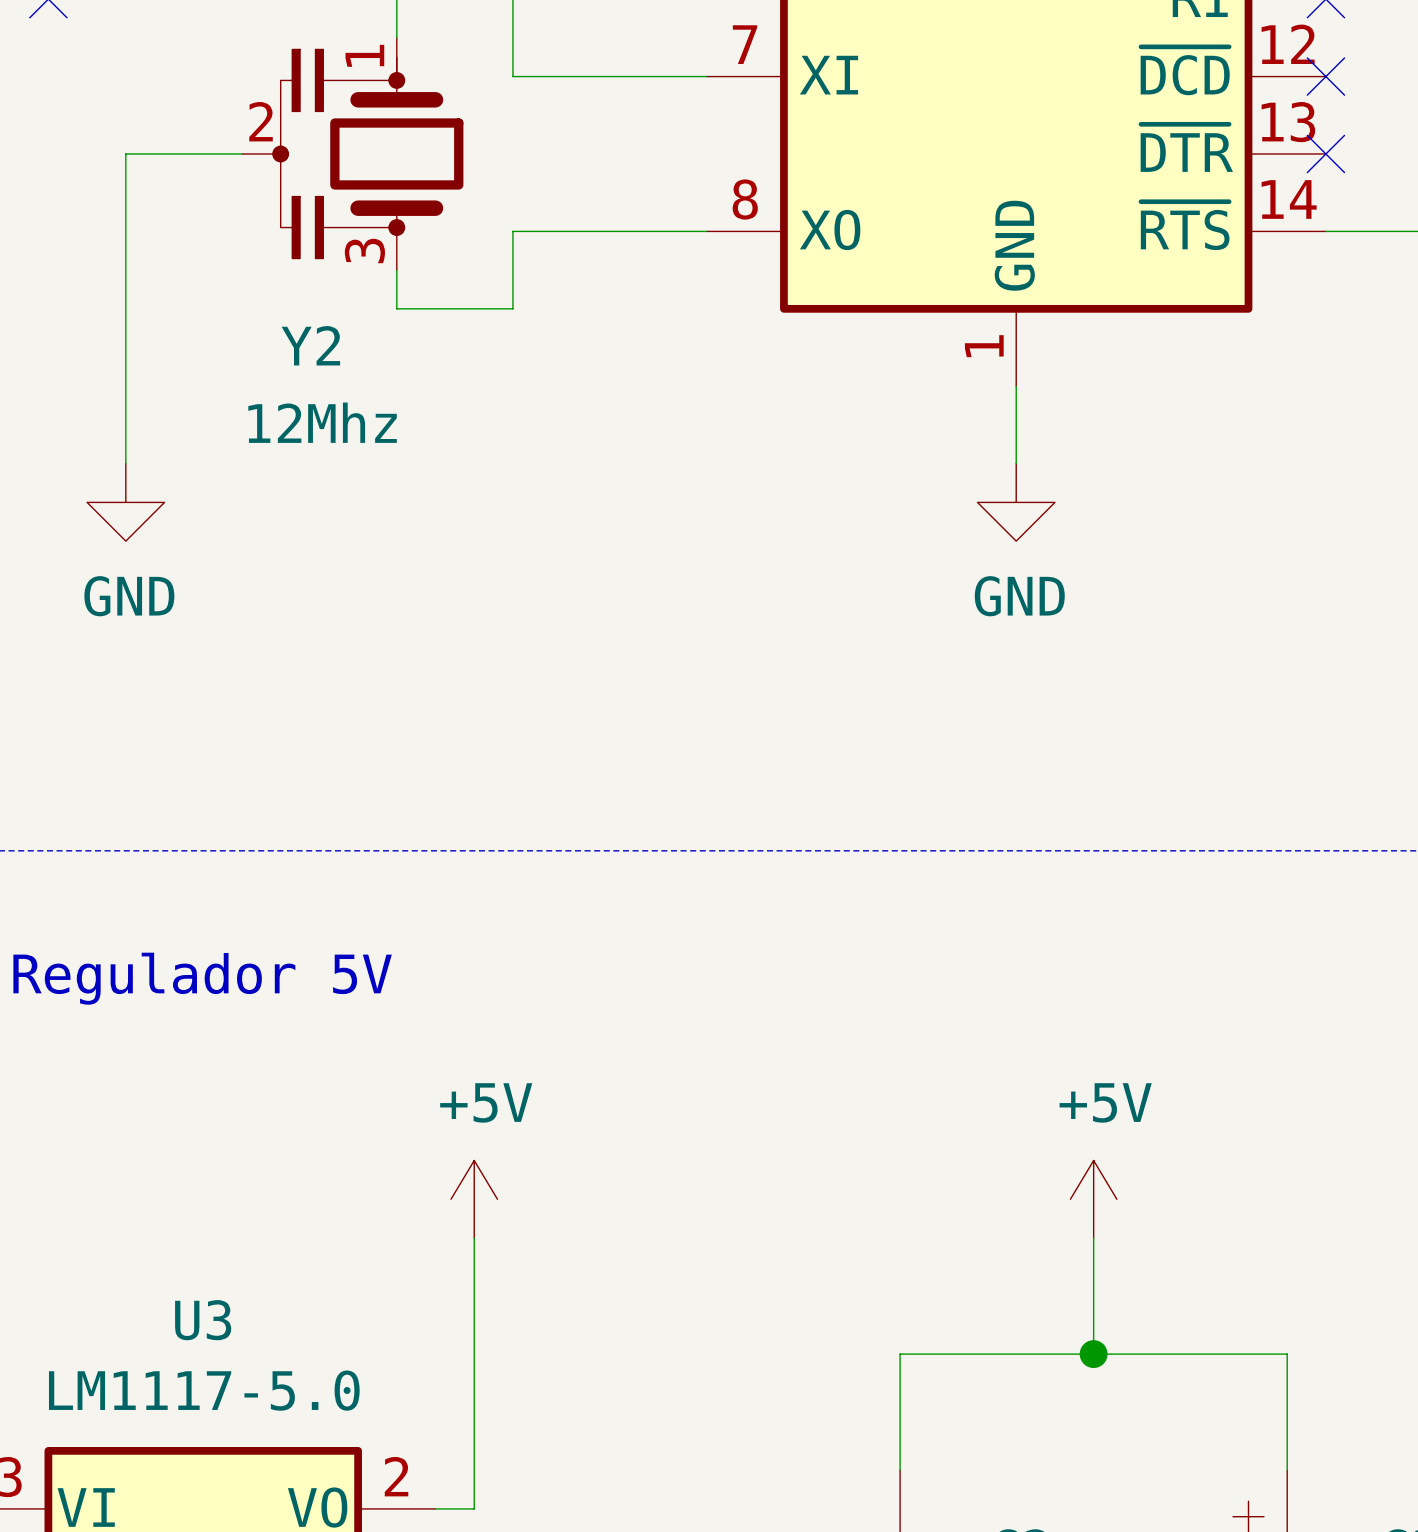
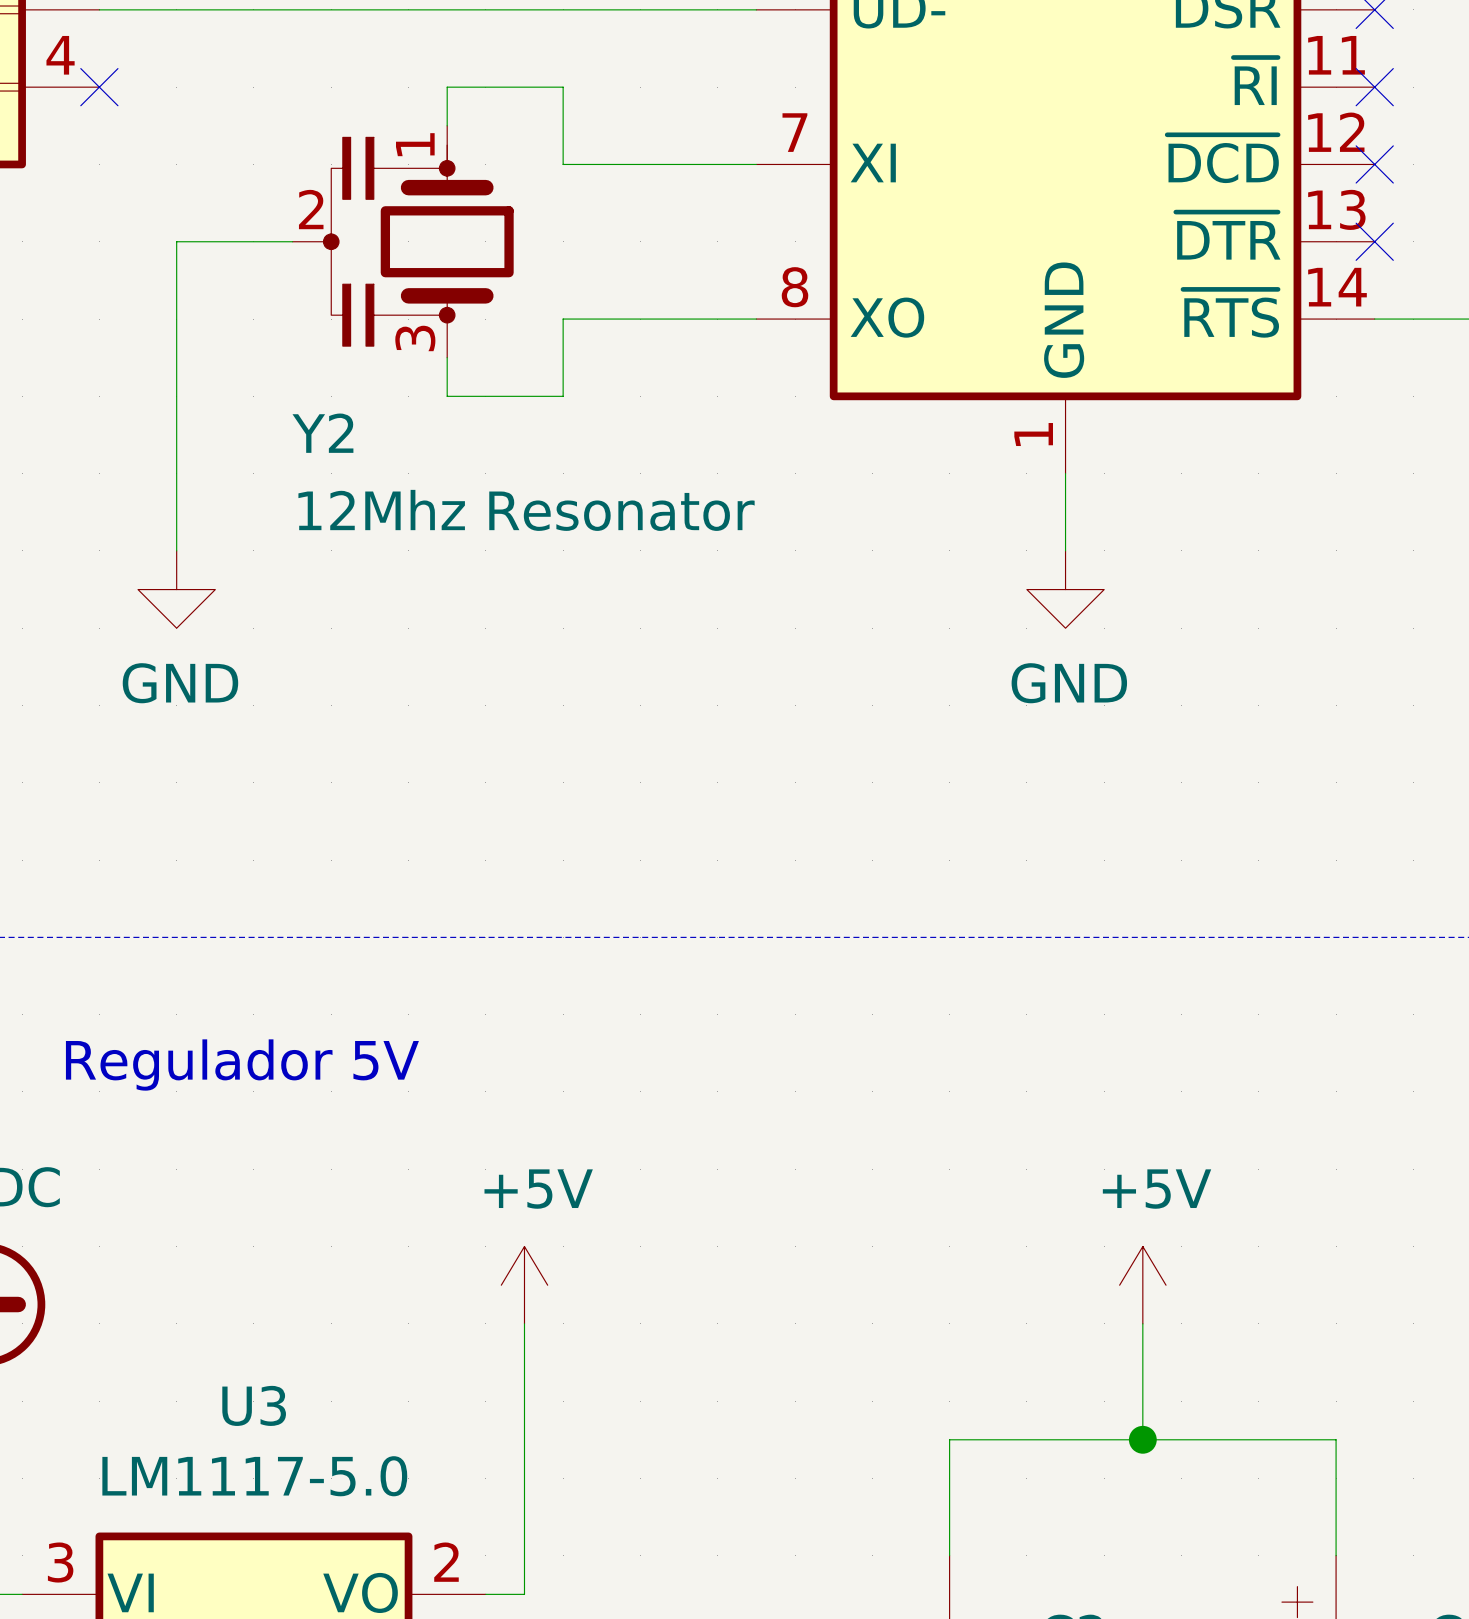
Y2 name position: Y2 (310, 345) -> Y2 (322, 433)
Y2 value: 12Mhz (322, 422) -> 12Mhz Resonator (526, 510)

